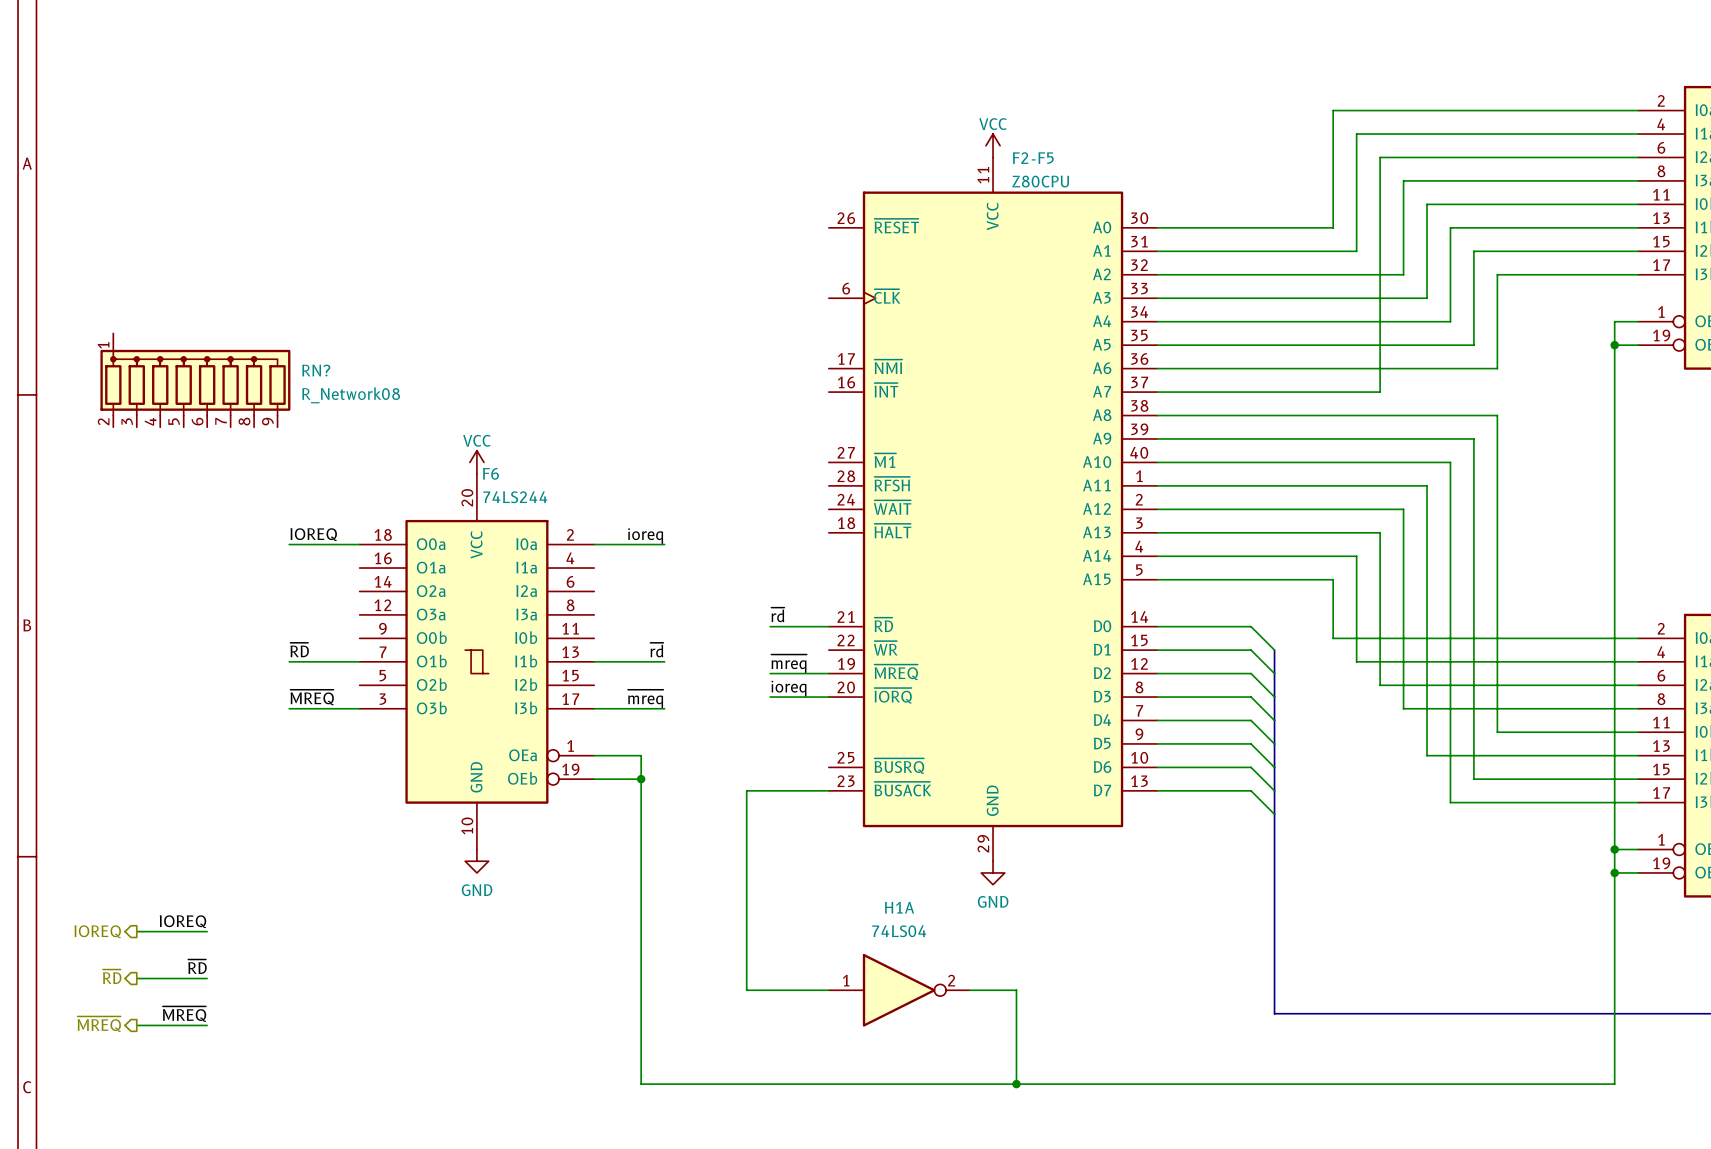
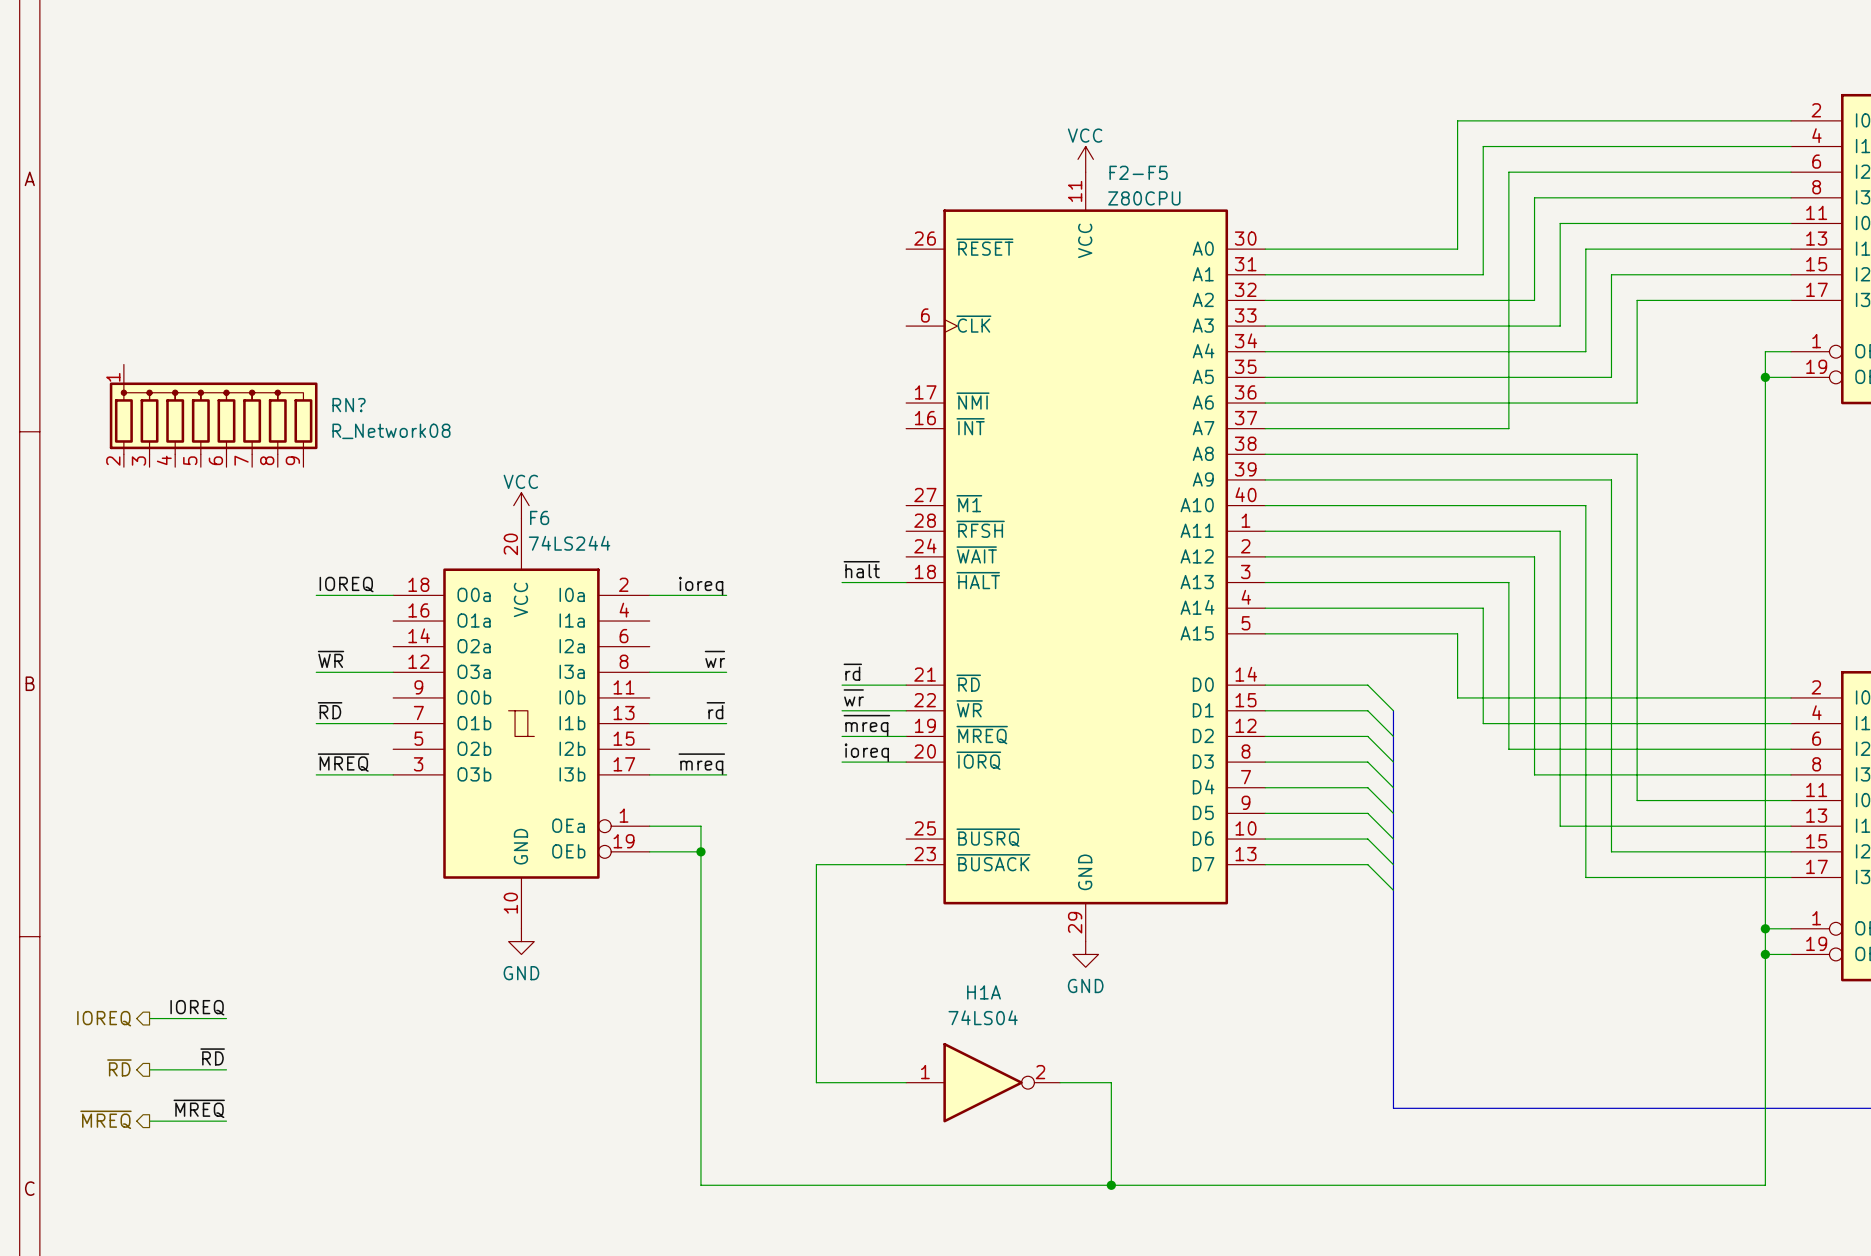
label: none -> ~{halt} (861, 569)
wire: none -> (842, 582) (906, 582)
label: none -> ~{WR} (331, 659)
label: none -> ~{wr} (714, 659)
wire: none -> (316, 672) (393, 672)
wire: none -> (649, 672) (726, 672)
label: none -> ~{wr} (853, 697)
wire: none -> (842, 710) (906, 710)

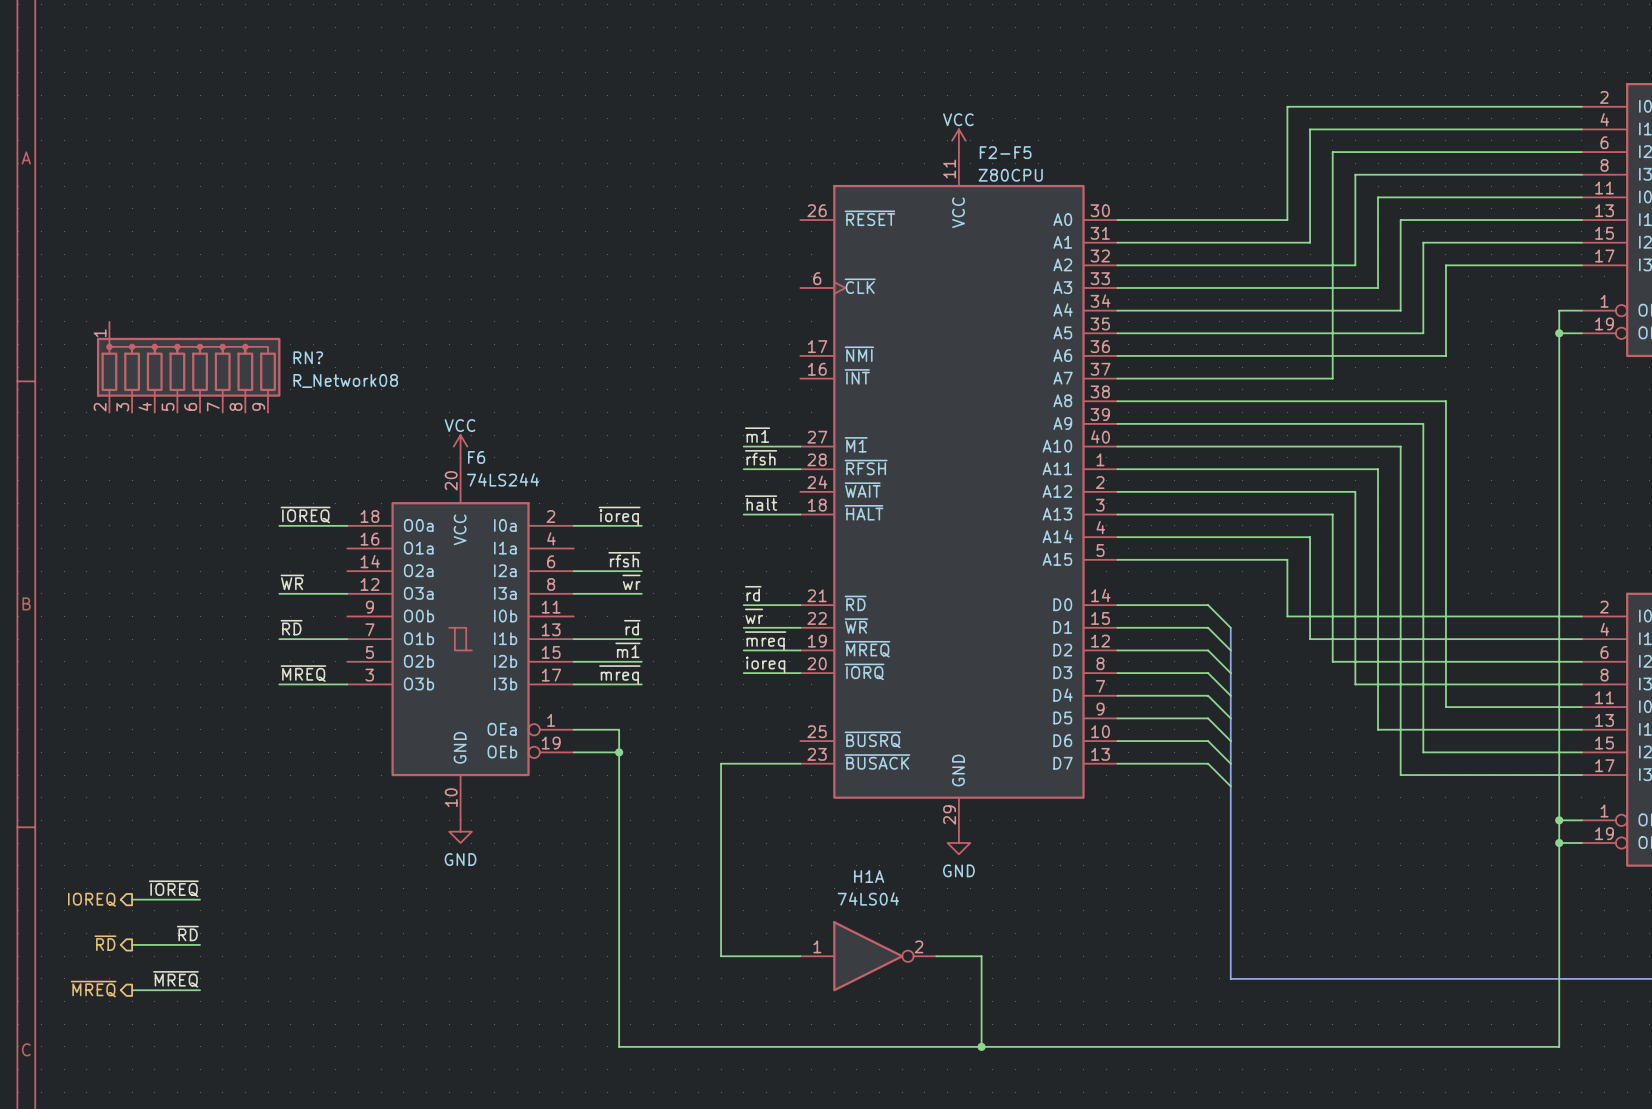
label: none -> ~{m1} (757, 435)
wire: none -> (743, 446) (800, 446)
label: none -> ~{rfsh} (761, 457)
wire: none -> (743, 469) (800, 469)
label: IOREQ (346, 584) -> ~{IOREQ} (305, 514)
label: ioreq (701, 586) -> ~{ioreq} (619, 516)
label: none -> ~{rfsh} (624, 559)
wire: none -> (573, 571) (641, 571)
label: none -> ~{m1} (627, 650)
wire: none -> (573, 661) (641, 661)
label: IOREQ (197, 1007) -> ~{IOREQ} (173, 888)

